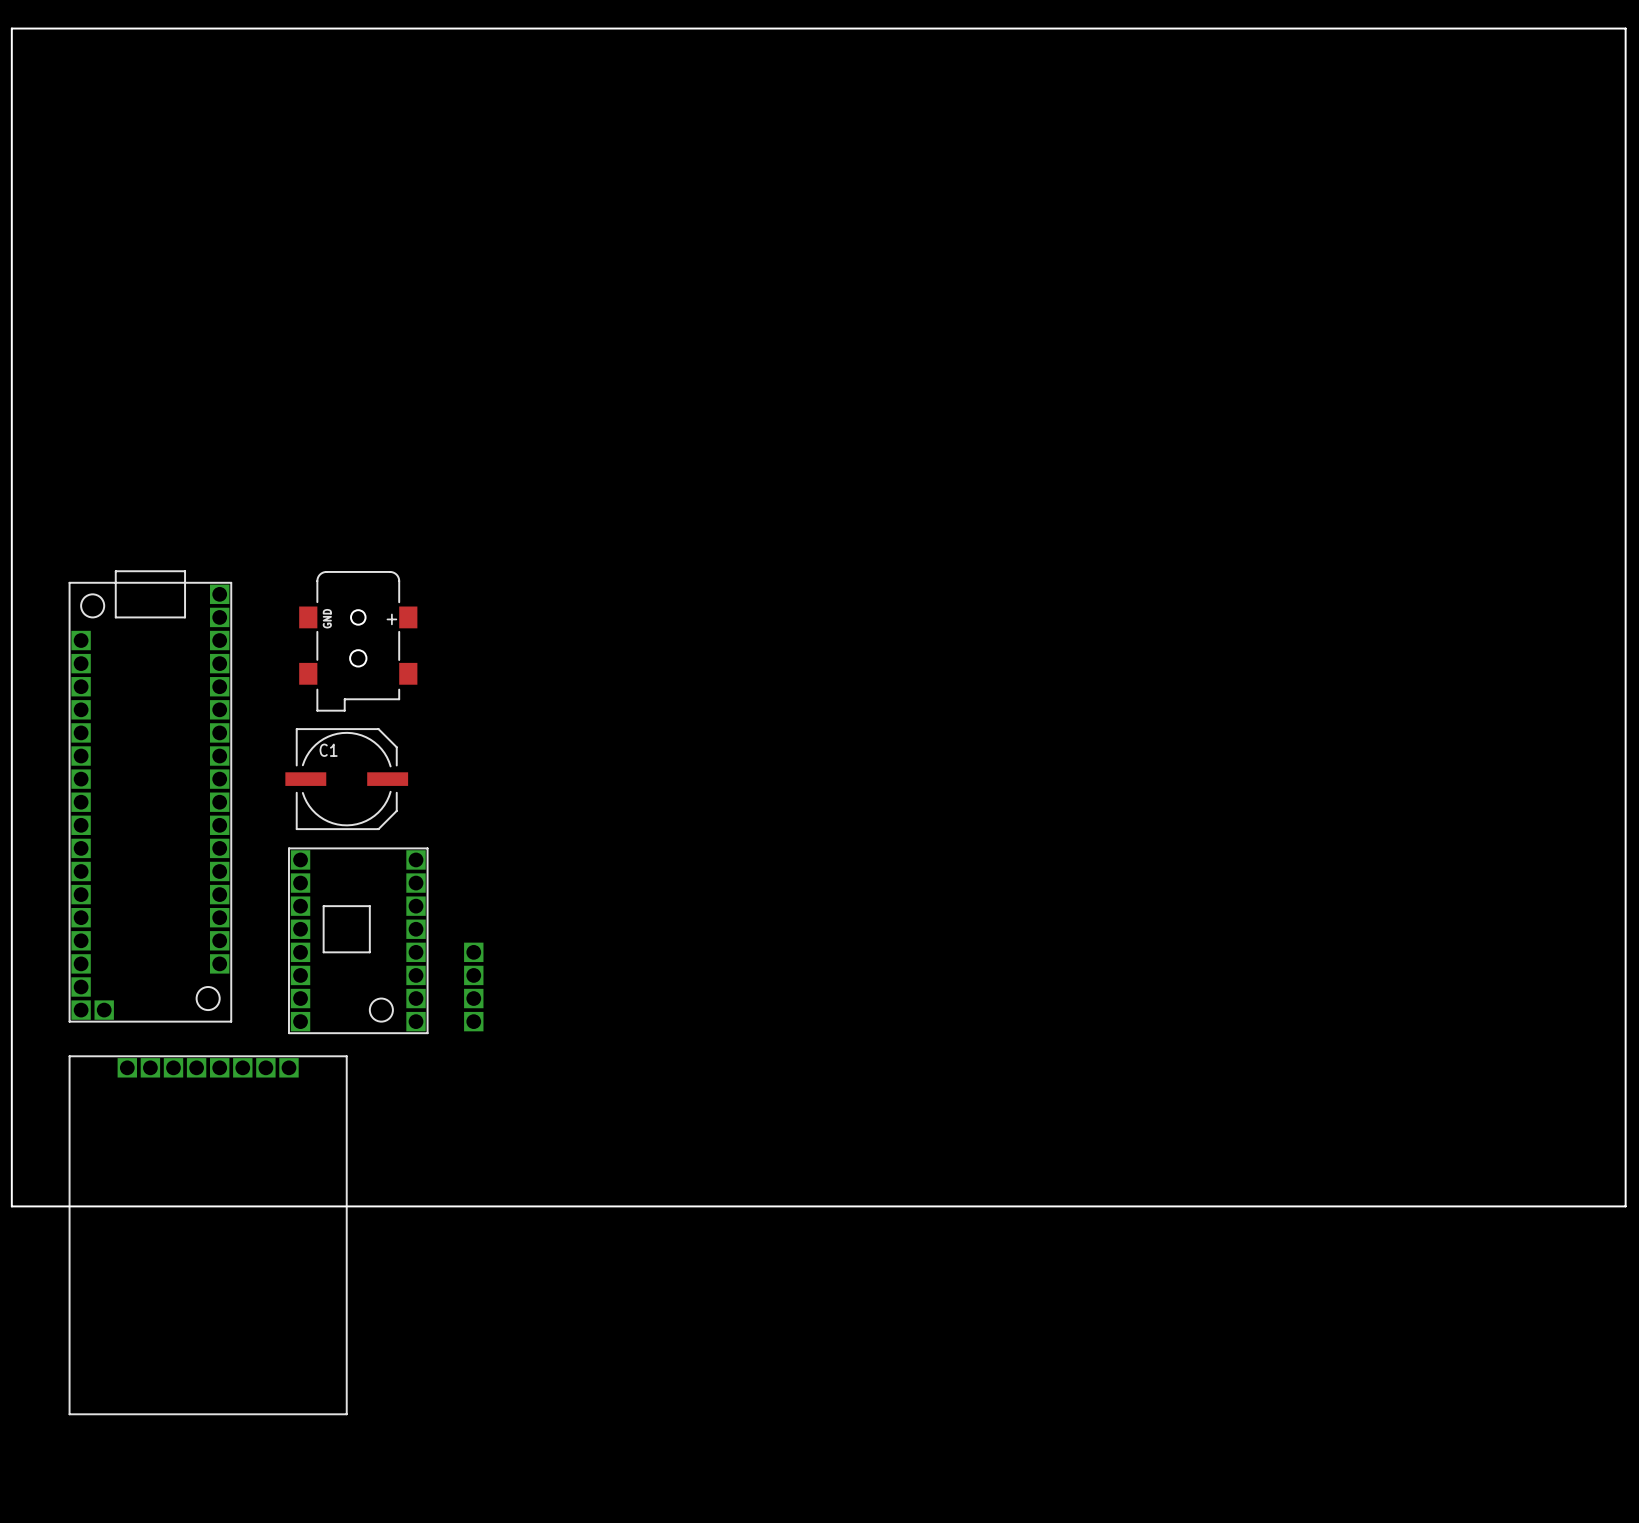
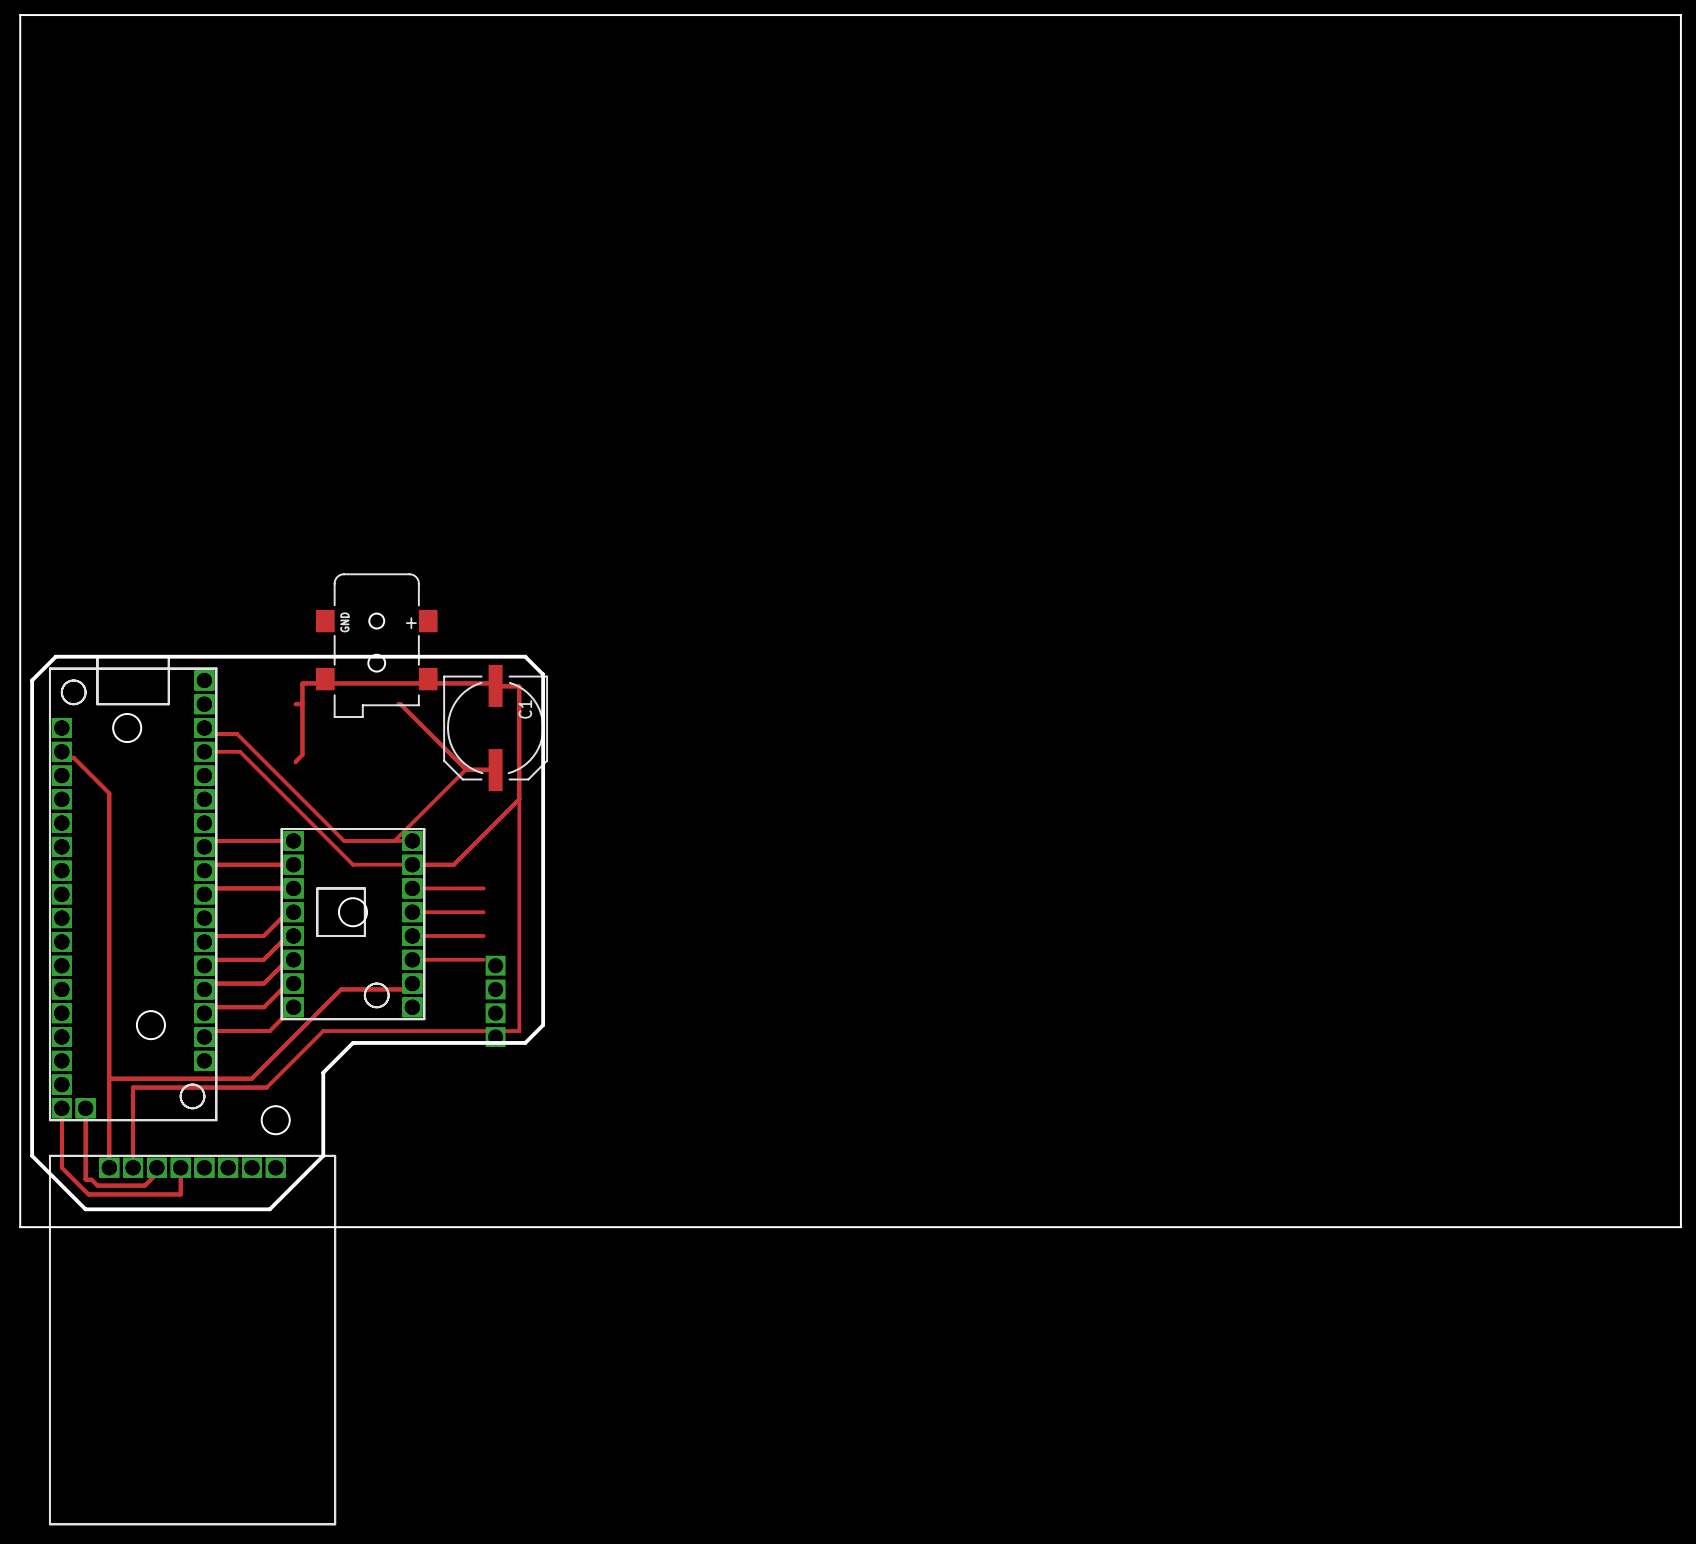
board edge: none -> (55, 656) (525, 656) (543, 674) (543, 1025) (525, 1042) (352, 1042) (323, 1072) (323, 1155) (269, 1209) (85, 1209) (32, 1155) (32, 680) (55, 656)
top track: none -> (295, 704) (302, 704)
top track: none -> (398, 704) (465, 769)
round board edge: none -> [113, 713, 142, 743]
top track: none -> (204, 728) (210, 733) (237, 733) (344, 840) (412, 840)
top track: none -> (61, 751) (67, 757) (73, 757) (109, 793) (109, 1167)
top track: none -> (204, 751) (240, 751) (352, 864) (454, 864) (519, 799)
top track: none -> (295, 762) (302, 754) (302, 683) (495, 683) (495, 686) (519, 686) (519, 1031) (323, 1031) (266, 1087) (133, 1087) (133, 1167)
top track: none -> (465, 769) (495, 770)
top track: none -> (465, 769) (394, 840)
C1 rotation: 0° (346, 779) -> 90° clockwise (495, 728)
C1 position: (346, 779) -> (495, 728)
part position: (150, 796) -> (133, 888)
top track: none -> (293, 840) (210, 840) (204, 846)
top track: none -> (293, 864) (210, 864) (204, 870)
top track: none -> (293, 888) (210, 888) (204, 894)
top track: none -> (412, 888) (483, 888)
round board edge: none -> [338, 898, 368, 927]
top track: none -> (293, 912) (287, 912) (263, 935) (210, 935) (204, 941)
top track: none -> (412, 912) (483, 912)
top track: none -> (293, 935) (287, 935) (263, 959) (210, 959) (204, 965)
top track: none -> (412, 935) (483, 935)
part position: (358, 940) -> (352, 924)
top track: none -> (293, 959) (287, 959) (263, 983) (210, 983) (204, 989)
top track: none -> (412, 959) (483, 959)
top track: none -> (293, 983) (287, 983) (263, 1007) (210, 1007) (204, 1013)
top track: none -> (412, 983) (406, 989) (341, 989) (251, 1078) (109, 1078)
top track: none -> (293, 1007) (269, 1031) (210, 1031) (204, 1037)
round board edge: none -> [136, 1010, 166, 1040]
round board edge: none -> [261, 1106, 290, 1135]
top track: none -> (61, 1108) (61, 1167) (88, 1194) (180, 1194) (180, 1167)
top track: none -> (85, 1108) (85, 1179) (91, 1179) (97, 1185) (145, 1185) (156, 1173) (156, 1167)
part position: (208, 1235) -> (192, 1340)

